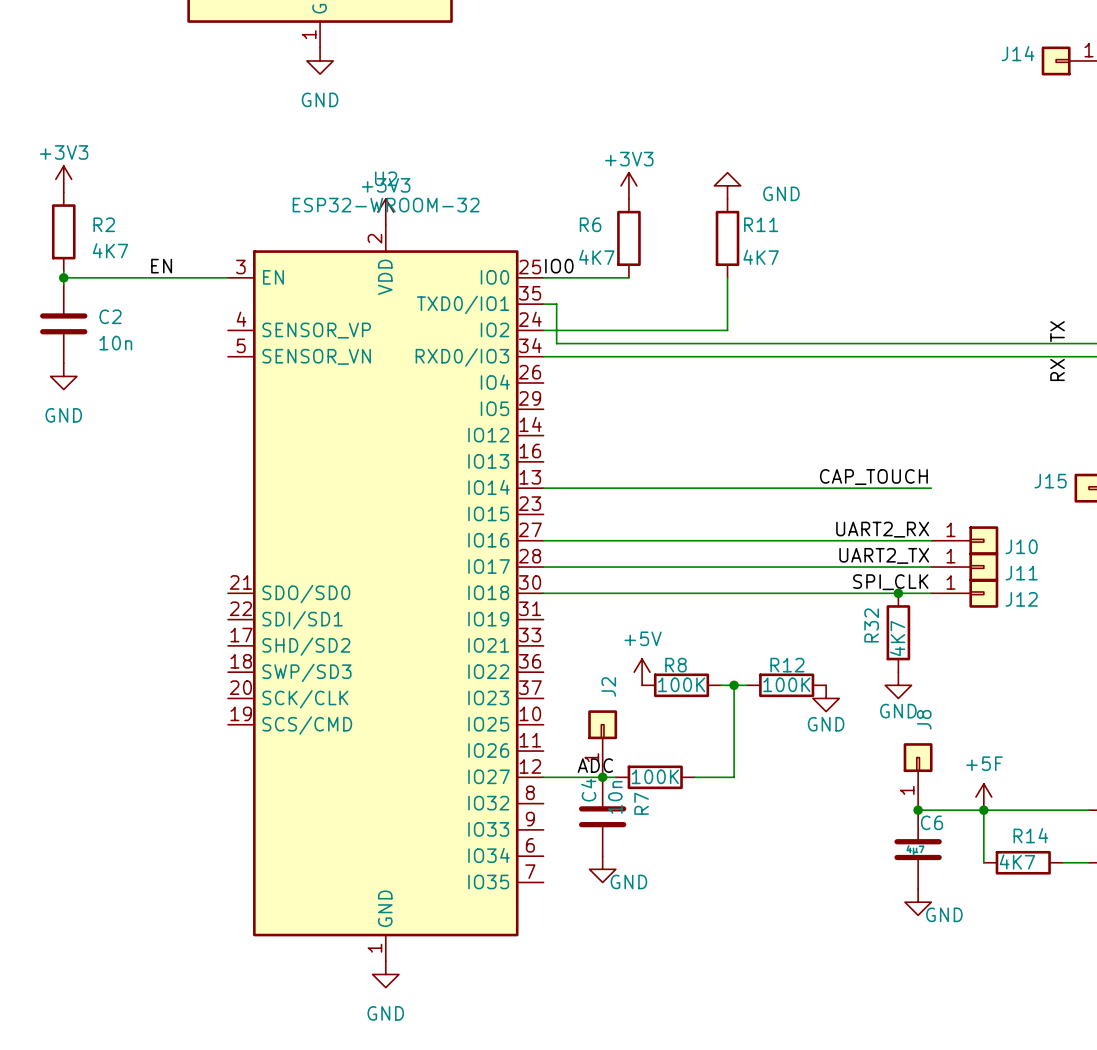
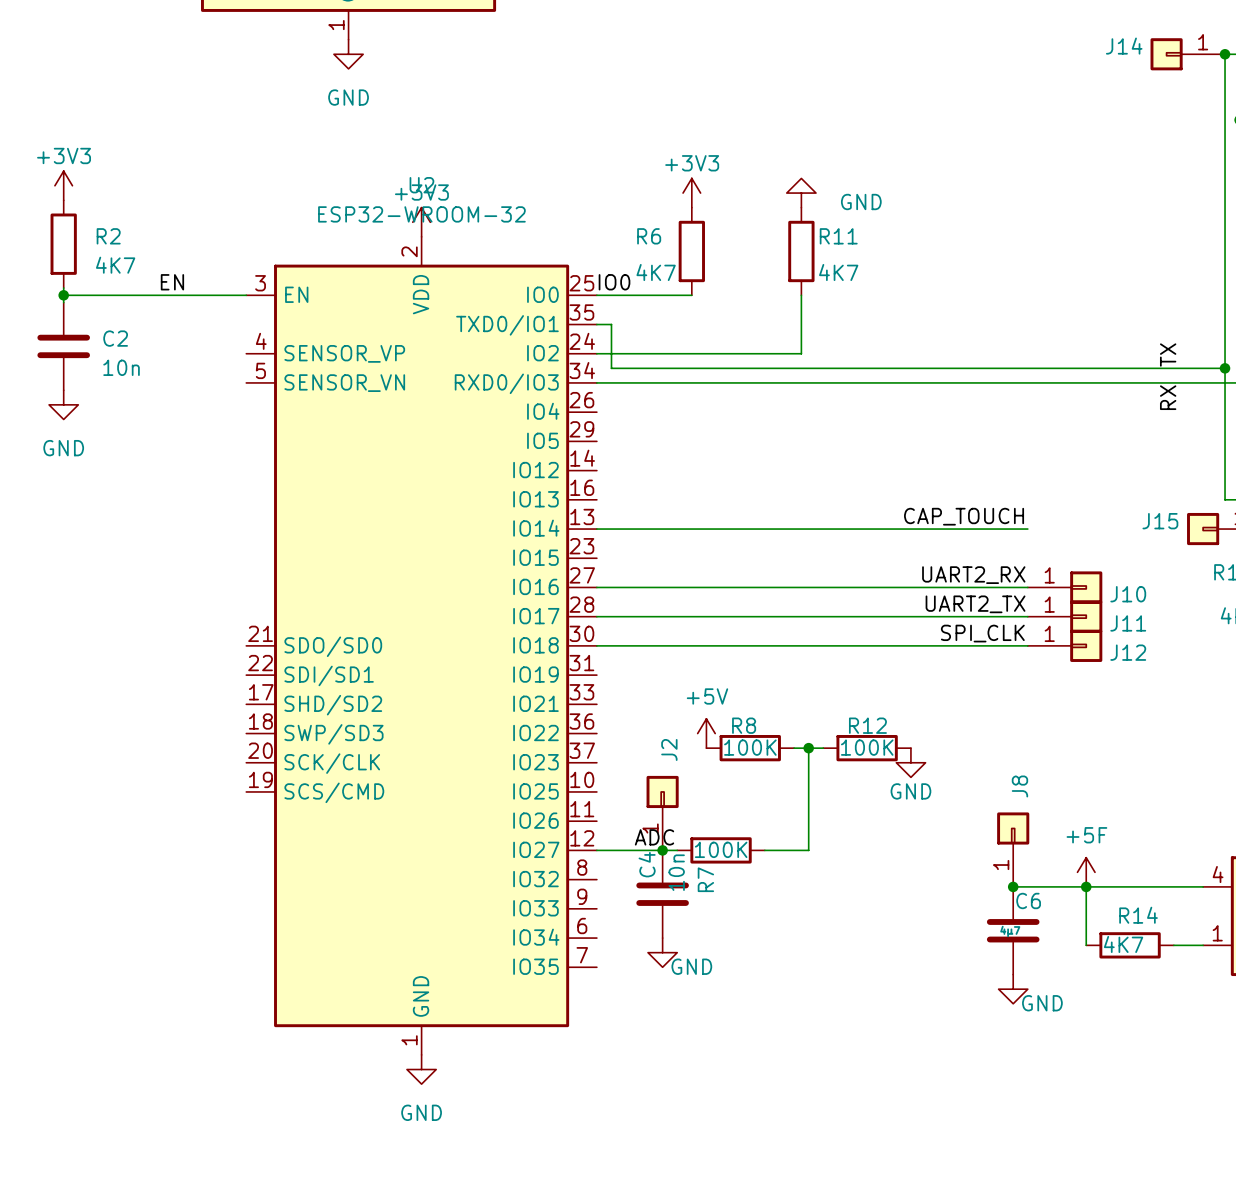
junction: (898, 593) -> none
R32: 4K7 (898, 632) -> none
power symbol: GND (898, 685) -> none

